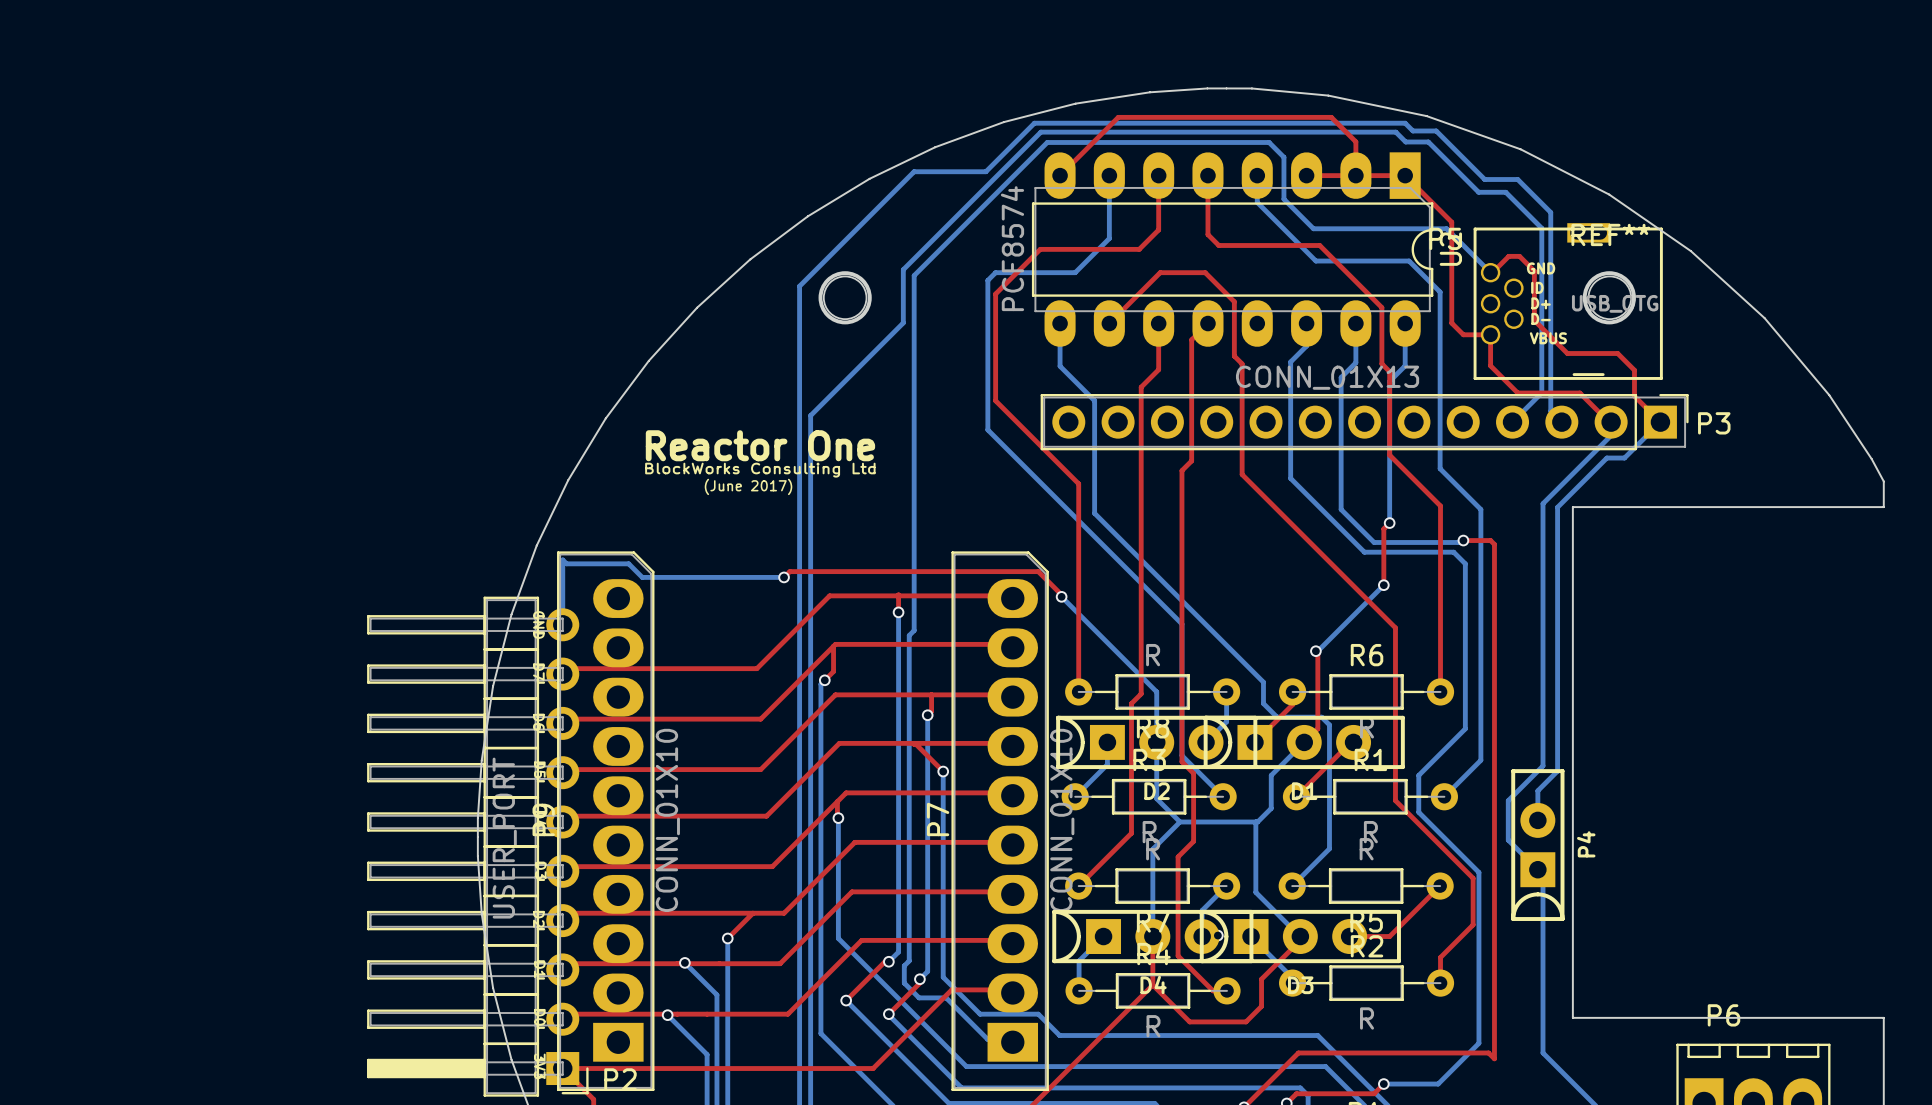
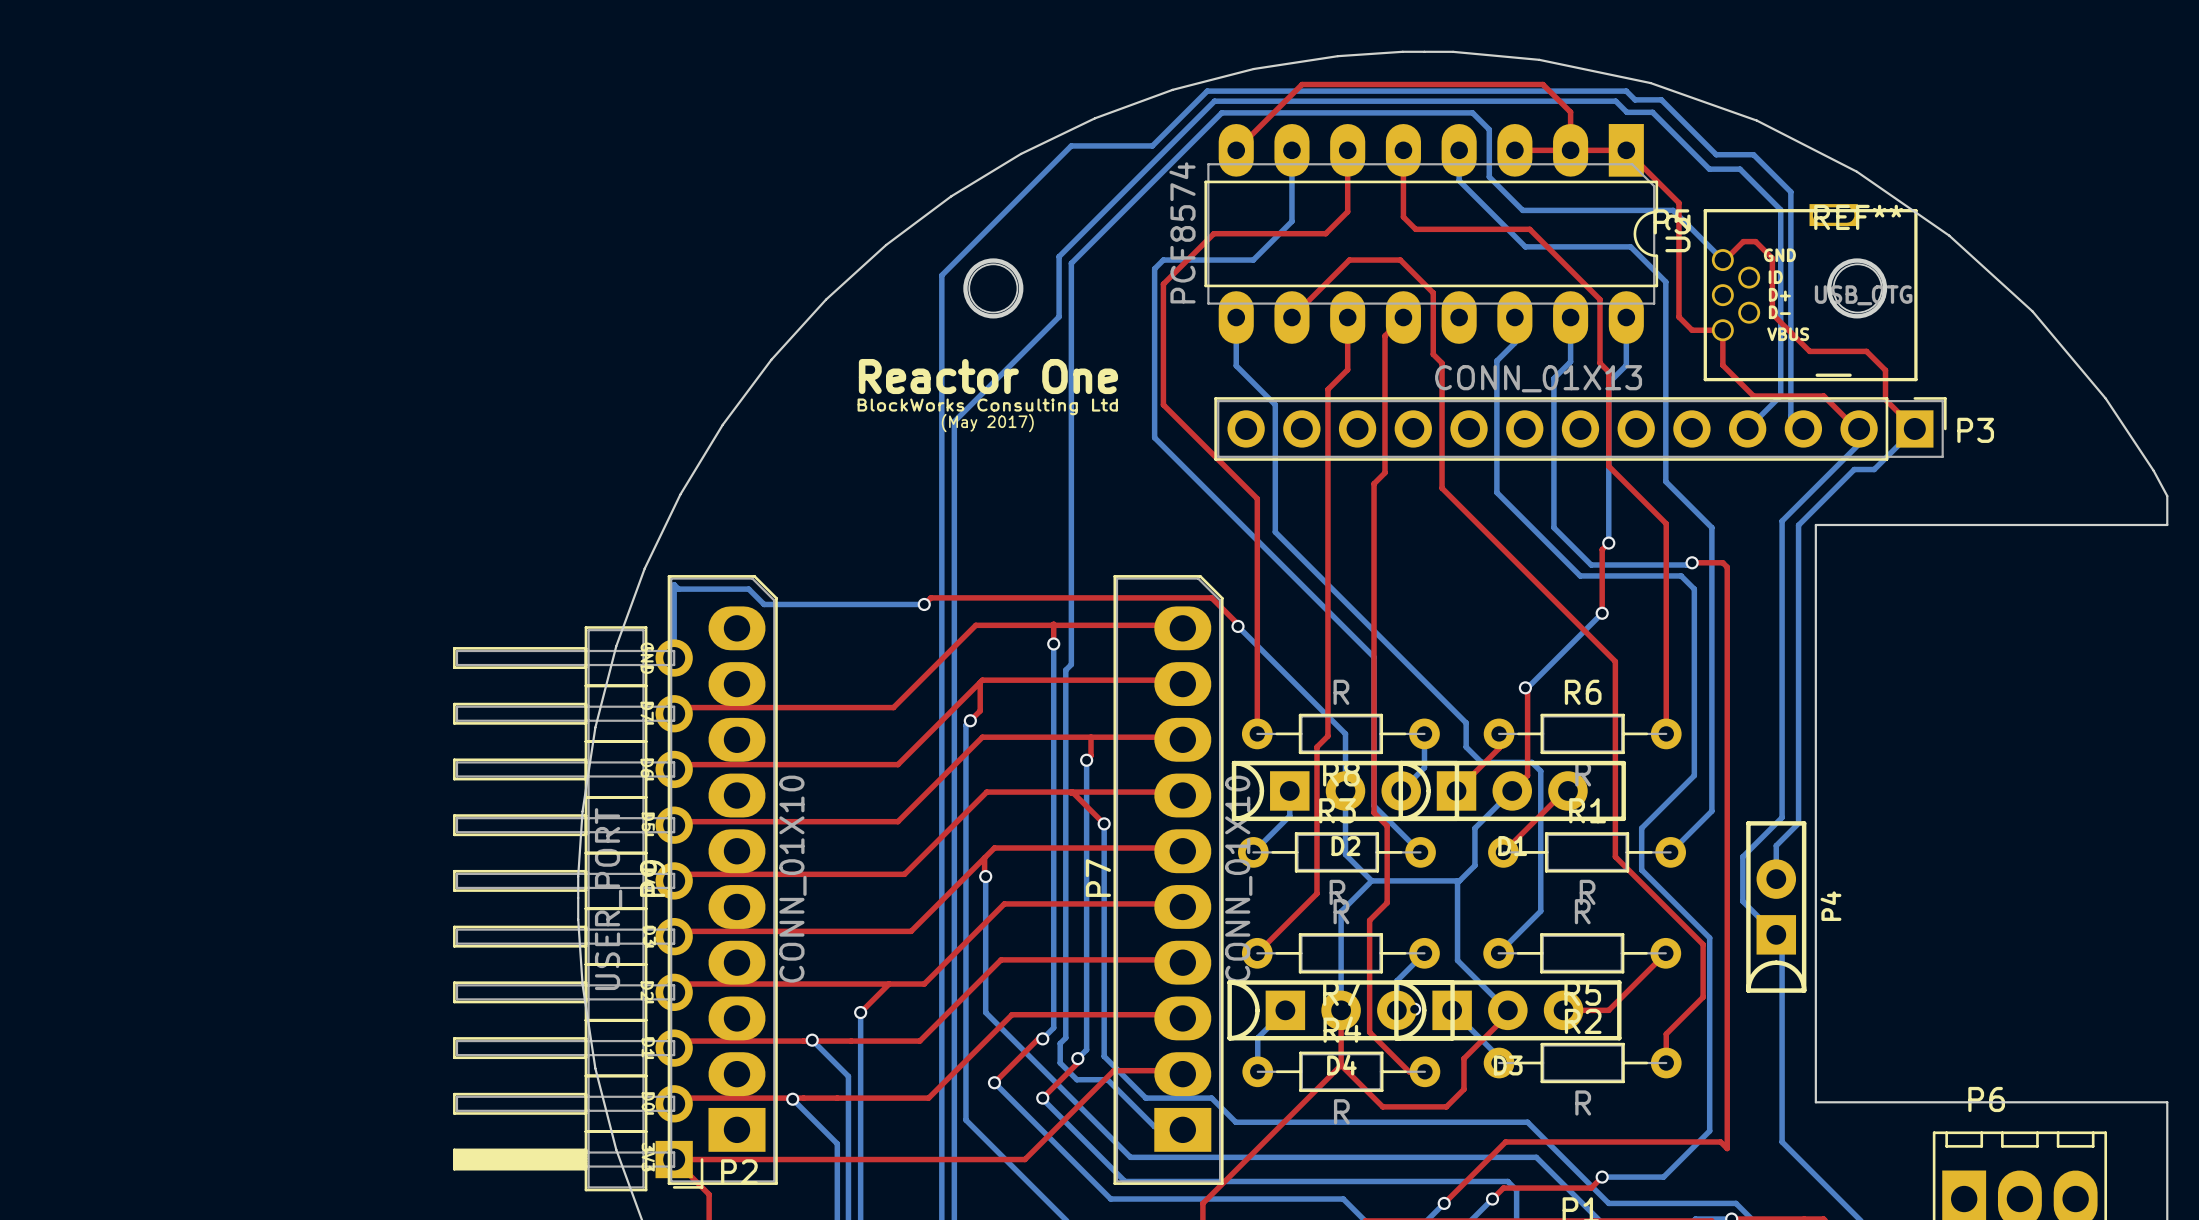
text: none -> (May 2017) (987, 423)
text position: Reactor One (760, 445) -> Reactor One (988, 376)
text position: BlockWorks Consulting Ltd (760, 470) -> BlockWorks Consulting Ltd (987, 406)
text: (June 2017) (748, 486) -> none

